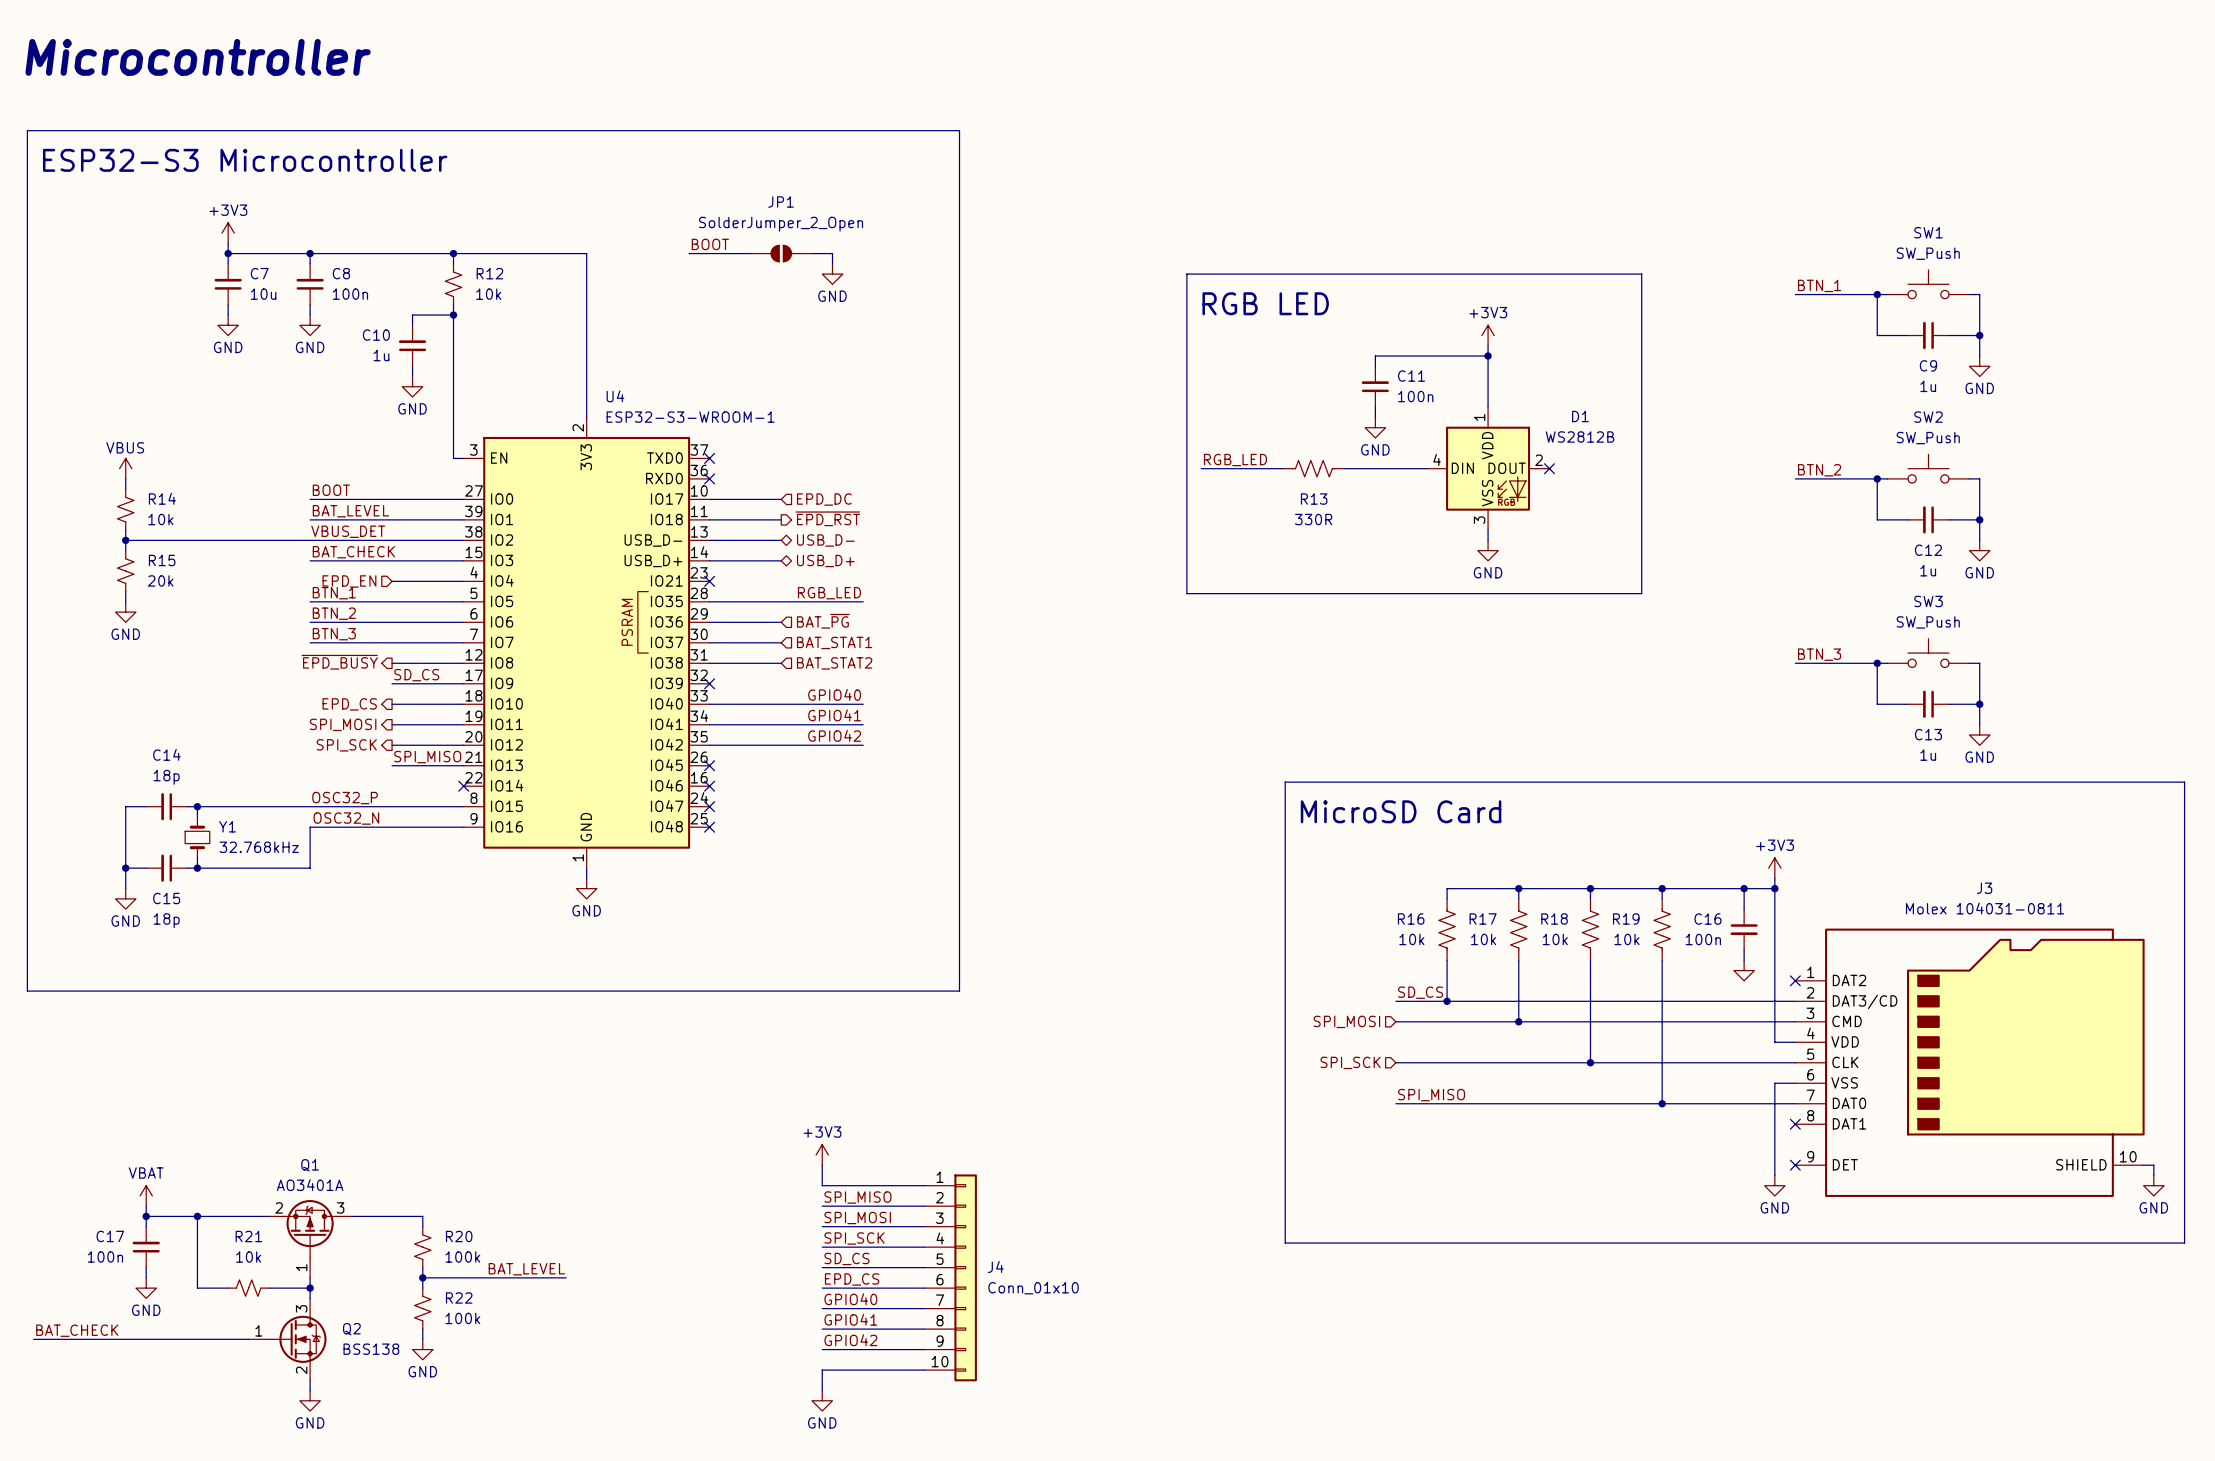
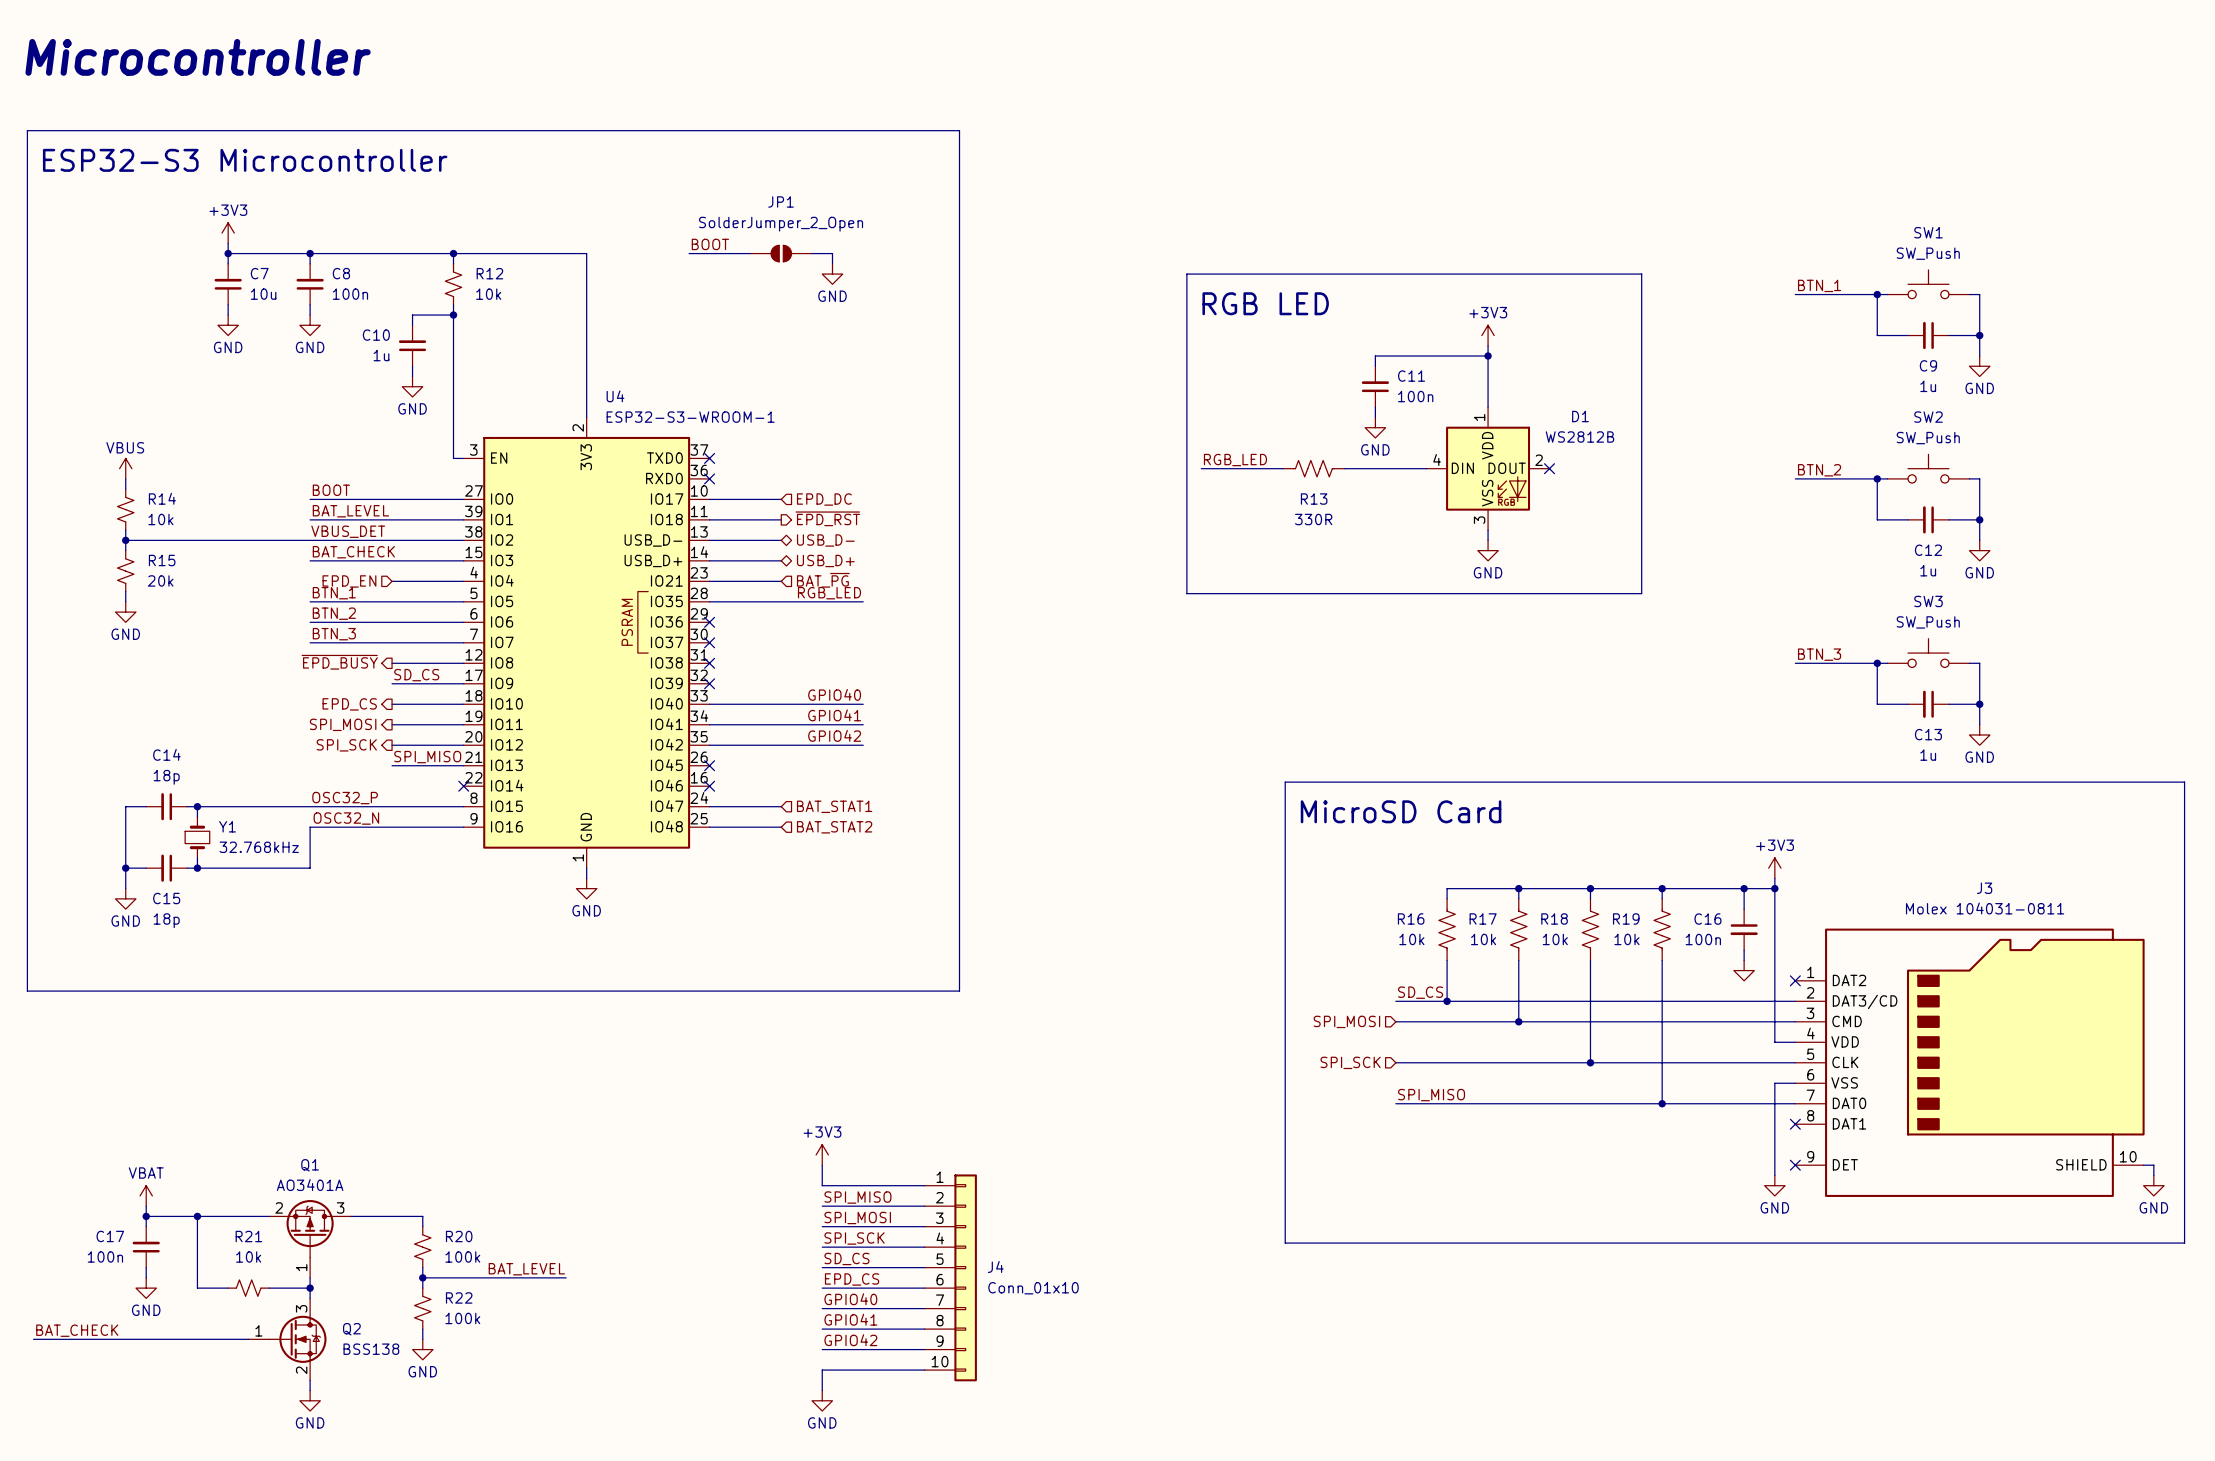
no-connect mark: (709, 581) -> none
hierarchical label position: BAT_~{PG} (823, 621) -> BAT_~{PG} (823, 580)
wire: (709, 622) (781, 622) -> (709, 581) (781, 581)
no-connect mark: none -> (709, 622)
wire: (709, 642) (781, 642) -> (709, 827) (781, 827)
no-connect mark: none -> (709, 642)
hierarchical label position: BAT_STAT1 (834, 642) -> BAT_STAT1 (834, 806)
wire: (709, 663) (781, 663) -> (709, 806) (781, 806)
no-connect mark: none -> (709, 663)
hierarchical label position: BAT_STAT2 (834, 663) -> BAT_STAT2 (834, 827)
no-connect mark: (709, 806) -> none
no-connect mark: (709, 827) -> none

